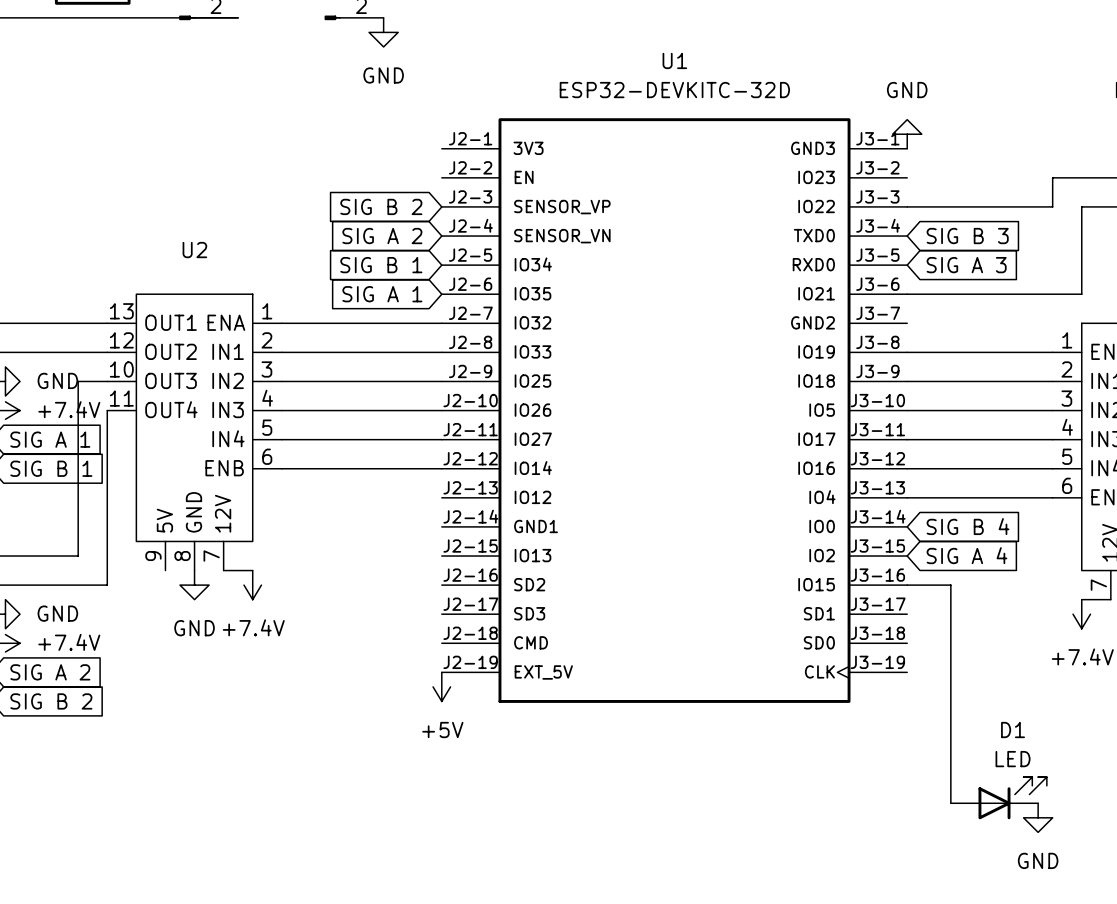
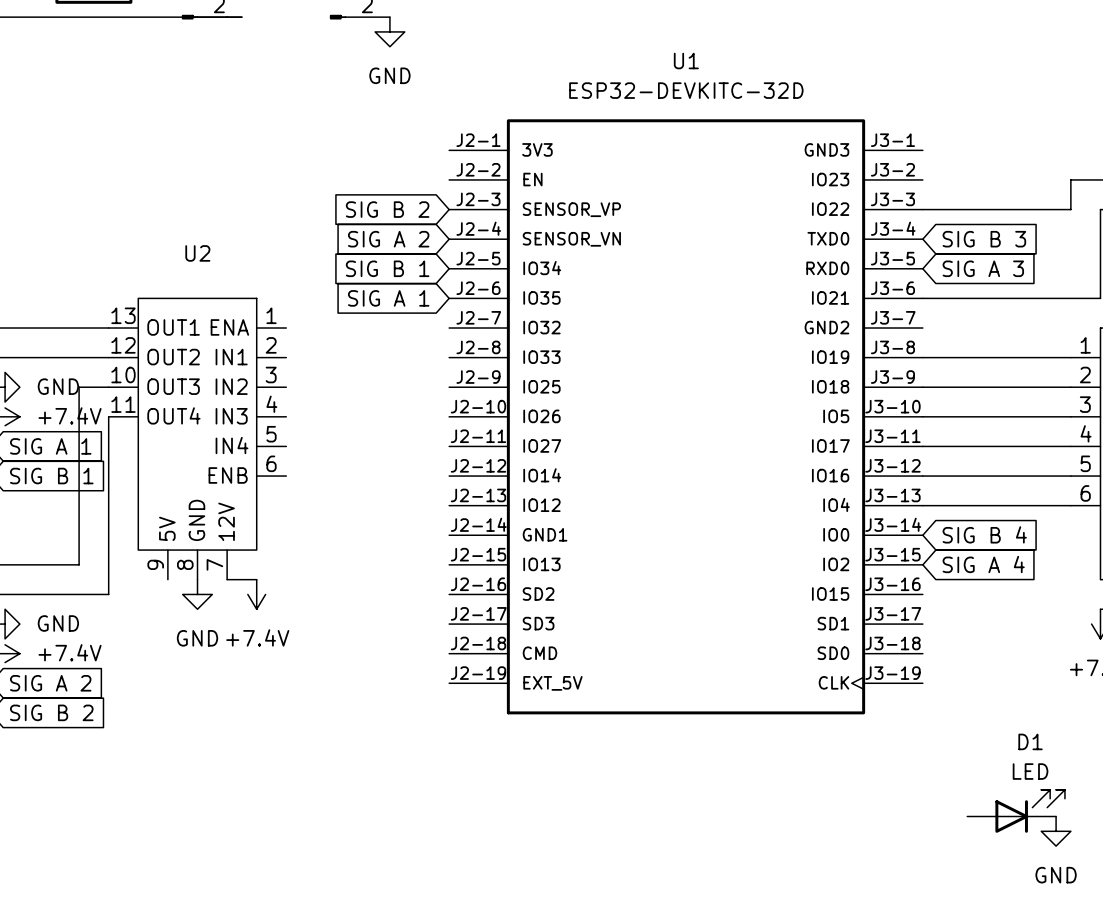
power symbol: GND (907, 134) -> none
wire: (281, 323) (441, 323) -> none
wire: (281, 352) (441, 352) -> none
wire: (281, 381) (441, 381) -> none
wire: (281, 410) (441, 410) -> none
wire: (281, 439) (441, 439) -> none
wire: (281, 468) (441, 468) -> none
wire: (907, 585) (950, 585) (950, 803) -> none
power symbol: +5V (441, 686) -> none

